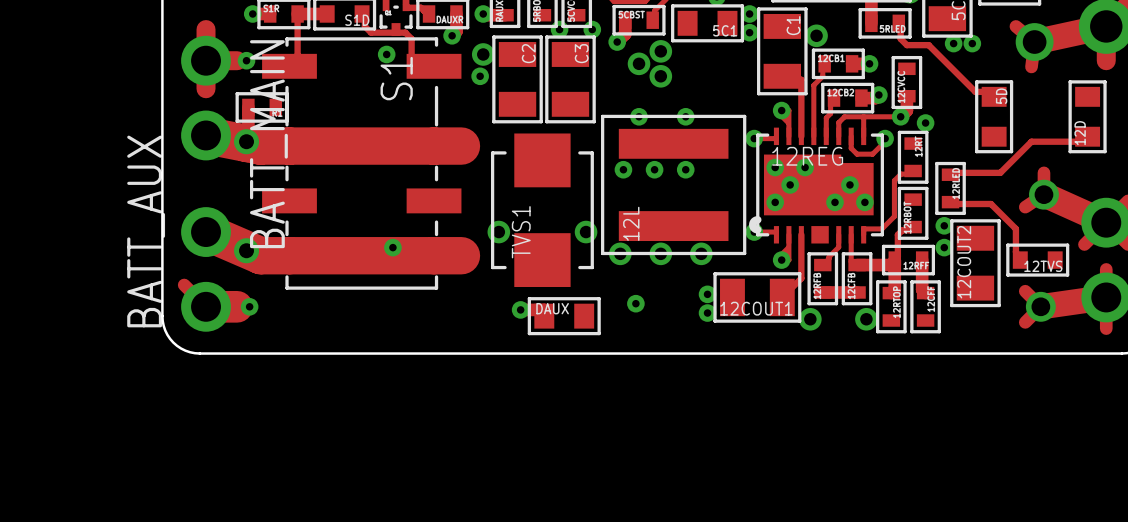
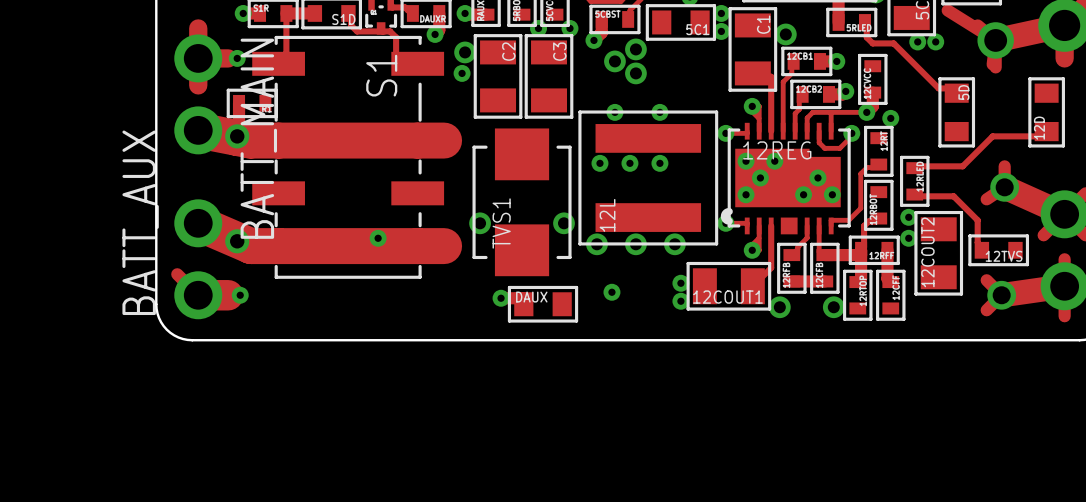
track: none -> (947, 10) (995, 40) (995, 67)
via: (386, 54) -> none

